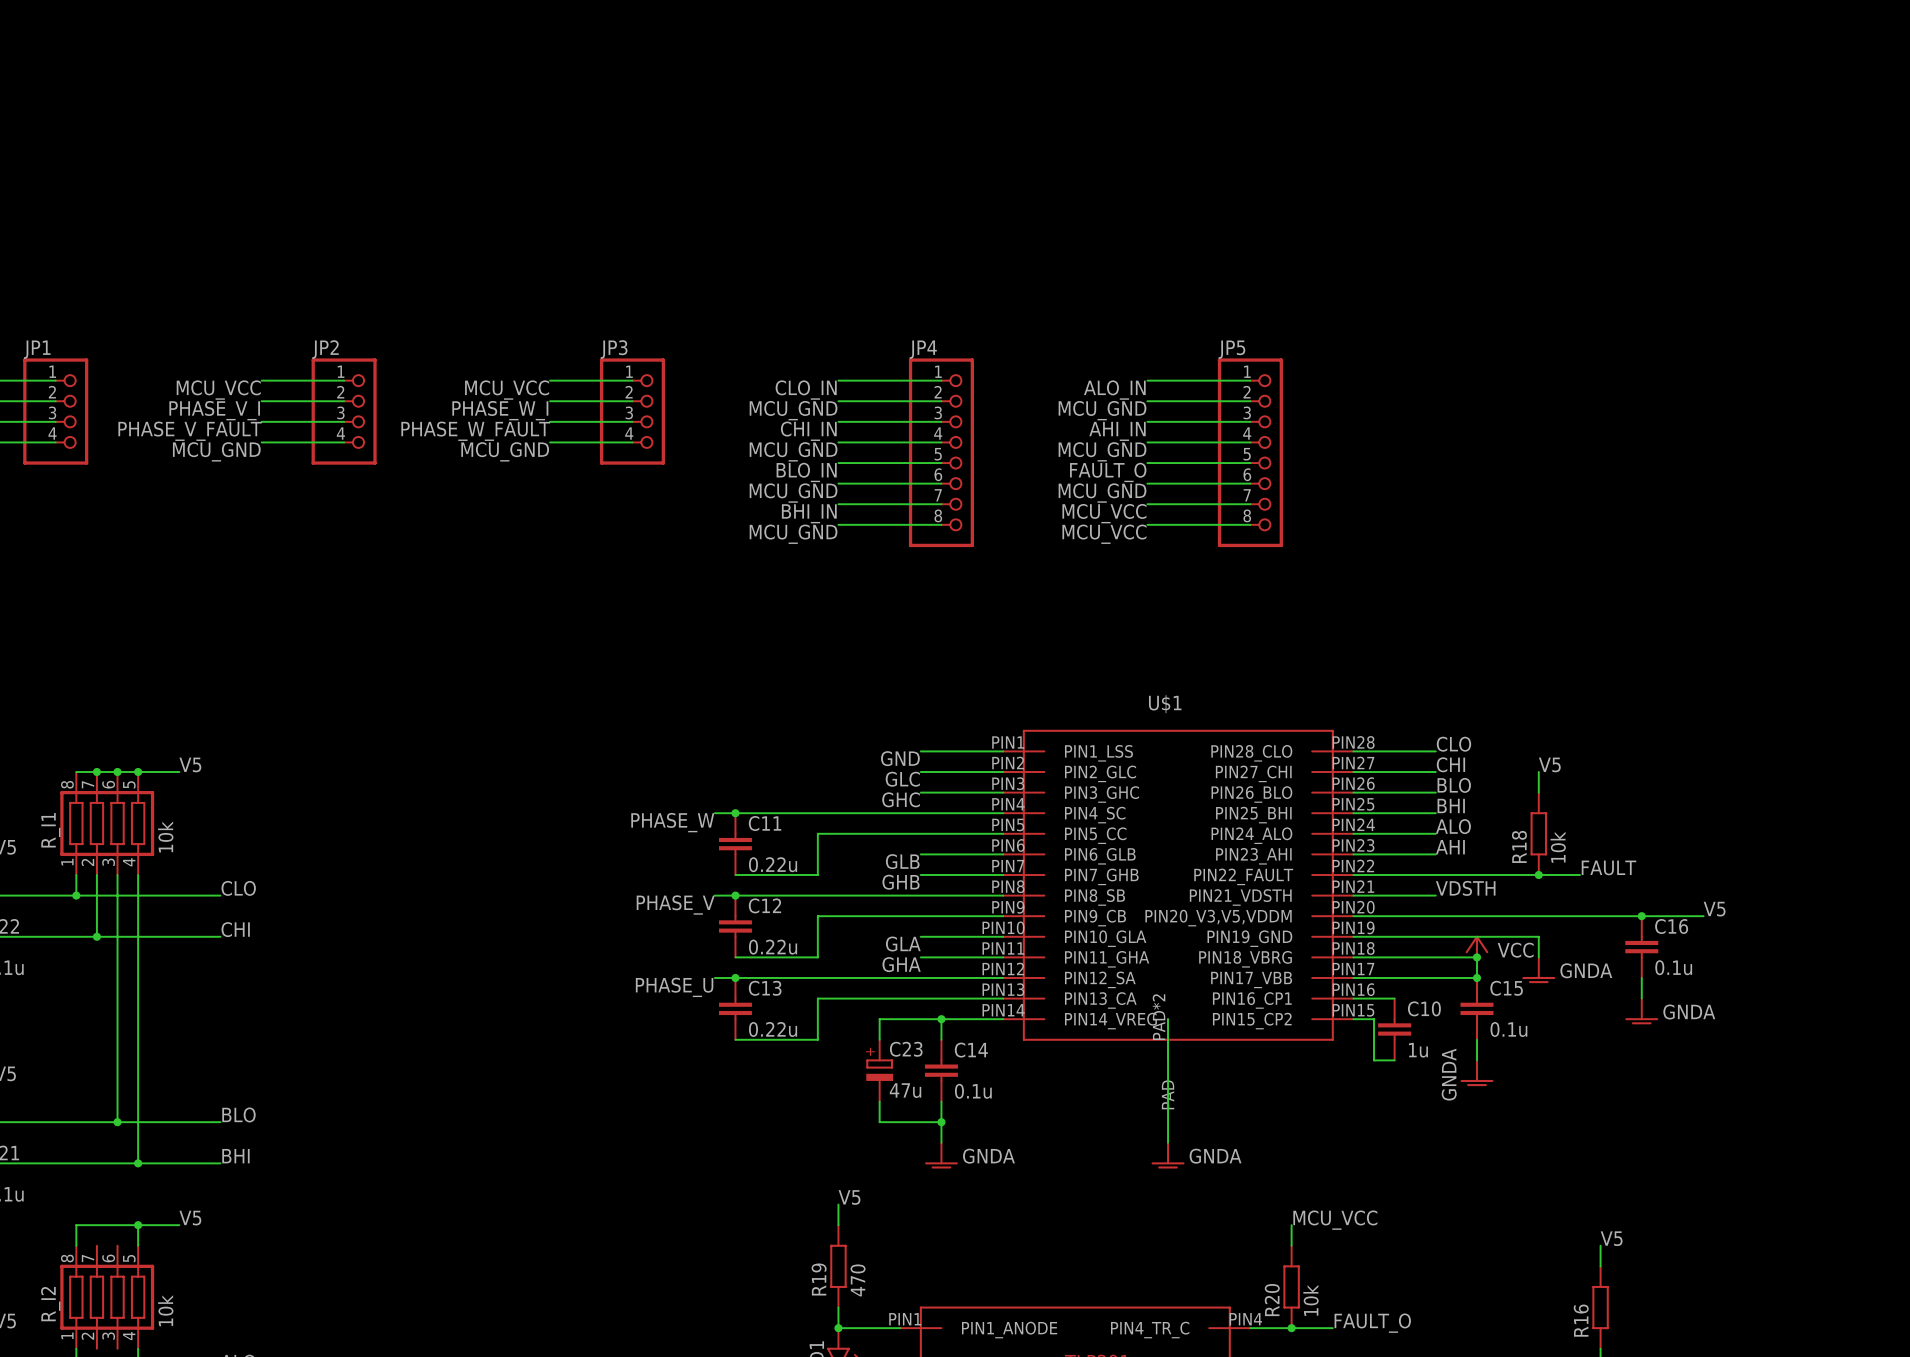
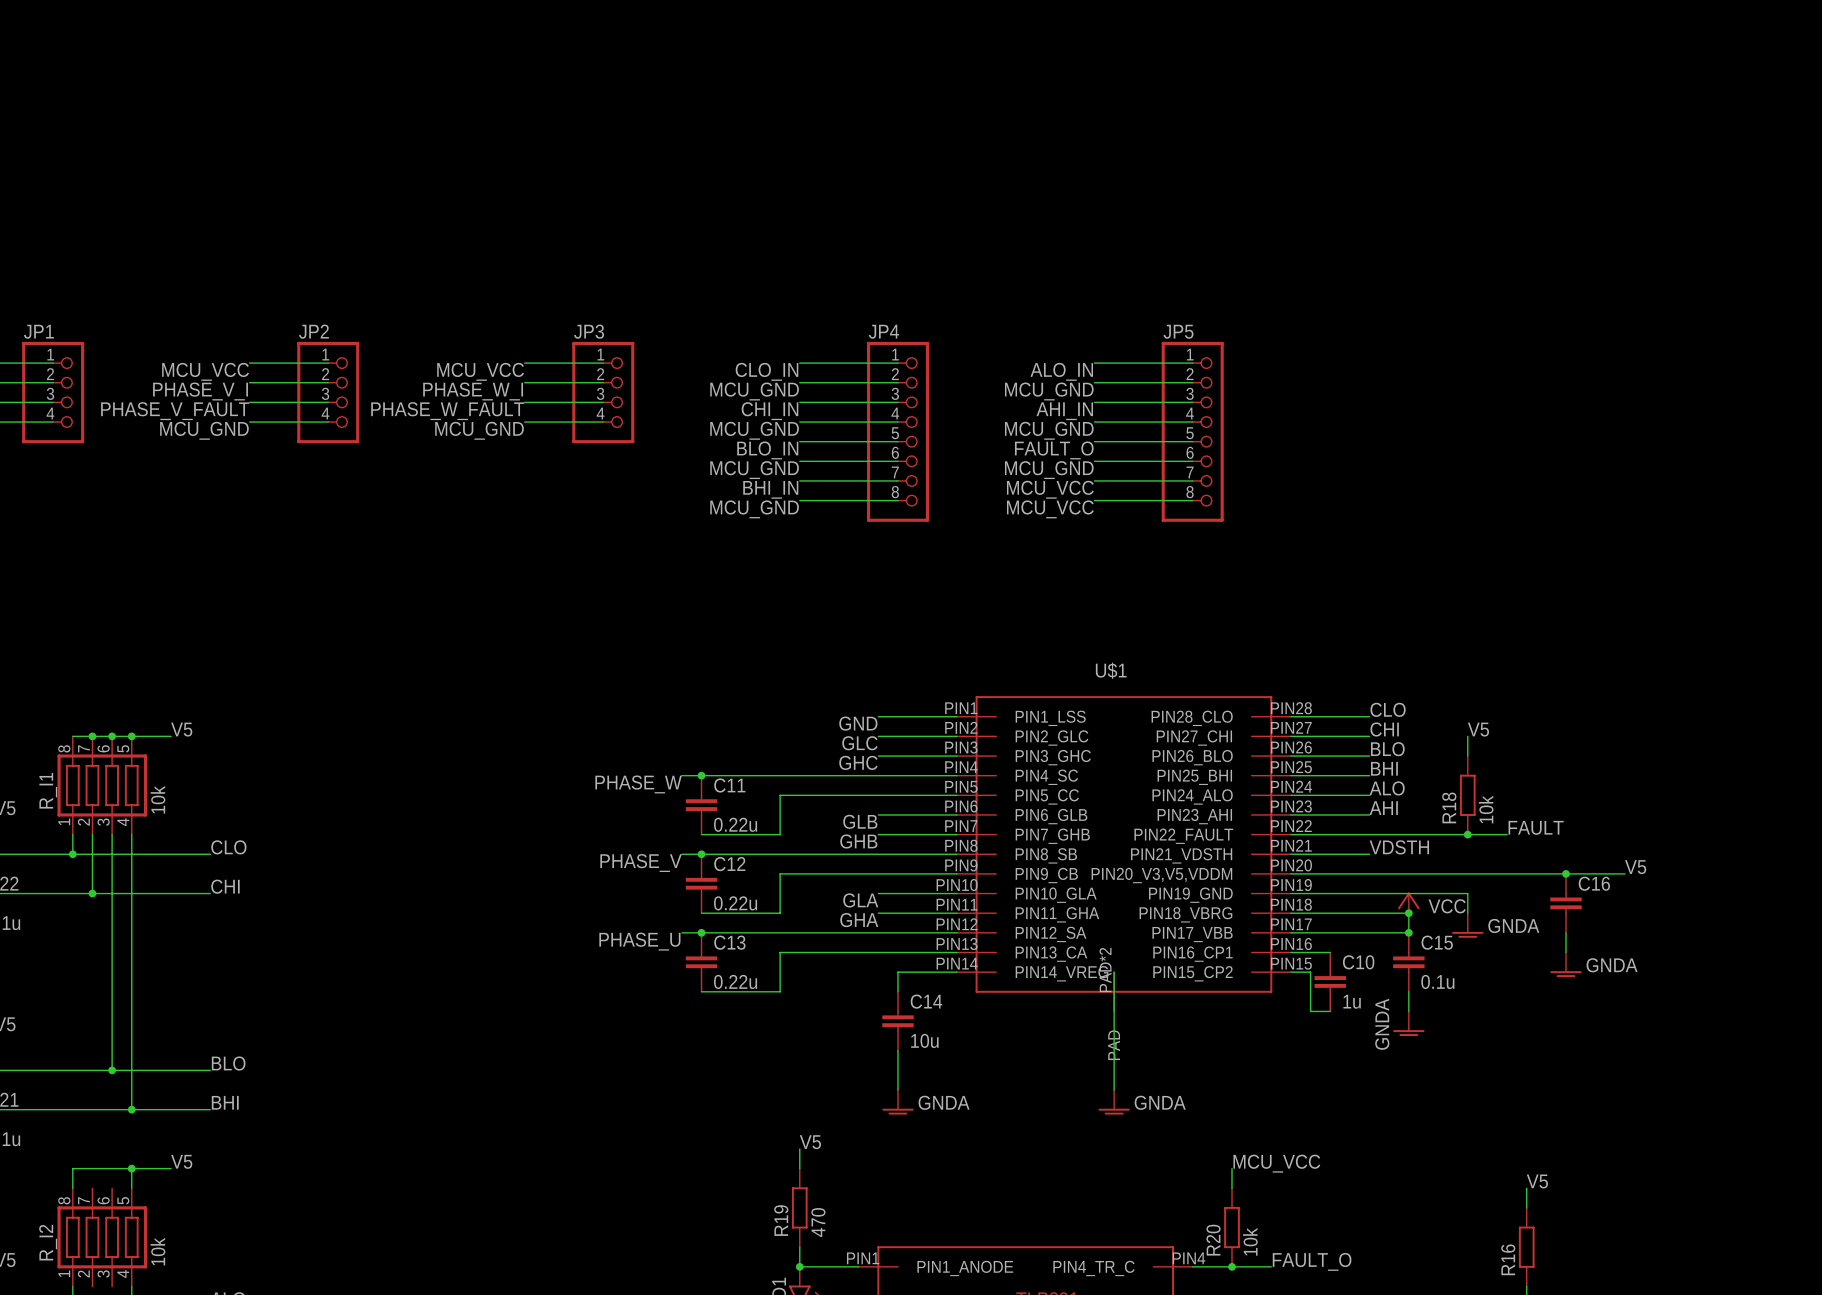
C16 value: 0.1u (1673, 967) -> none
wire: (941, 1019) (879, 1019) (879, 1039) -> none
junction: (941, 1019) -> none
C23: 47u (879, 1070) -> none
C14 value: 0.1u (973, 1091) -> 10u (924, 1040)
wire: (879, 1101) (879, 1122) (941, 1122) -> none
junction: (941, 1122) -> none

